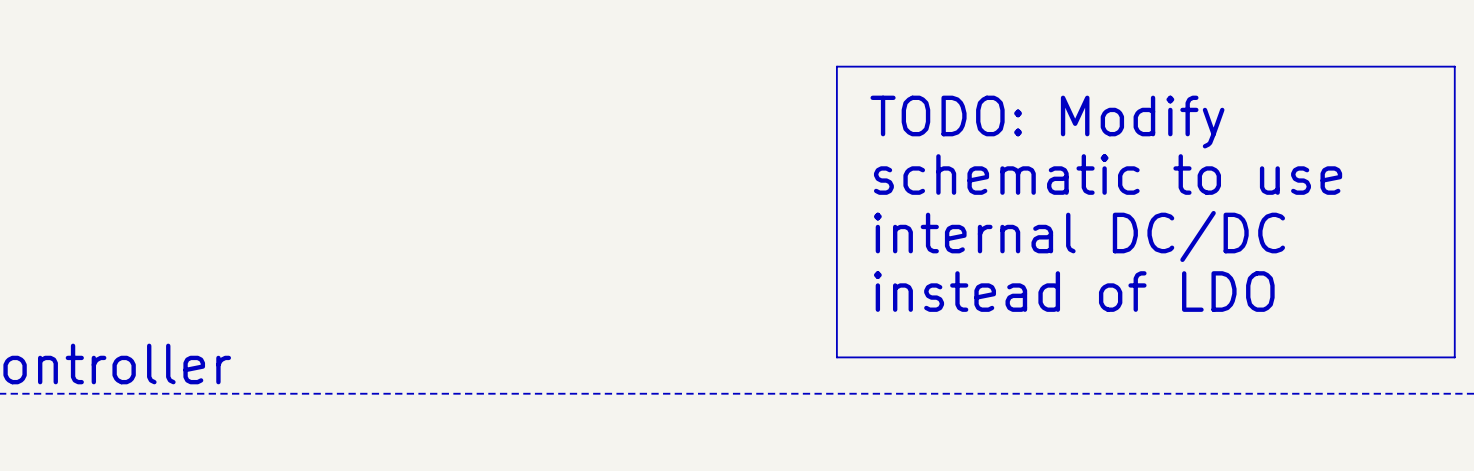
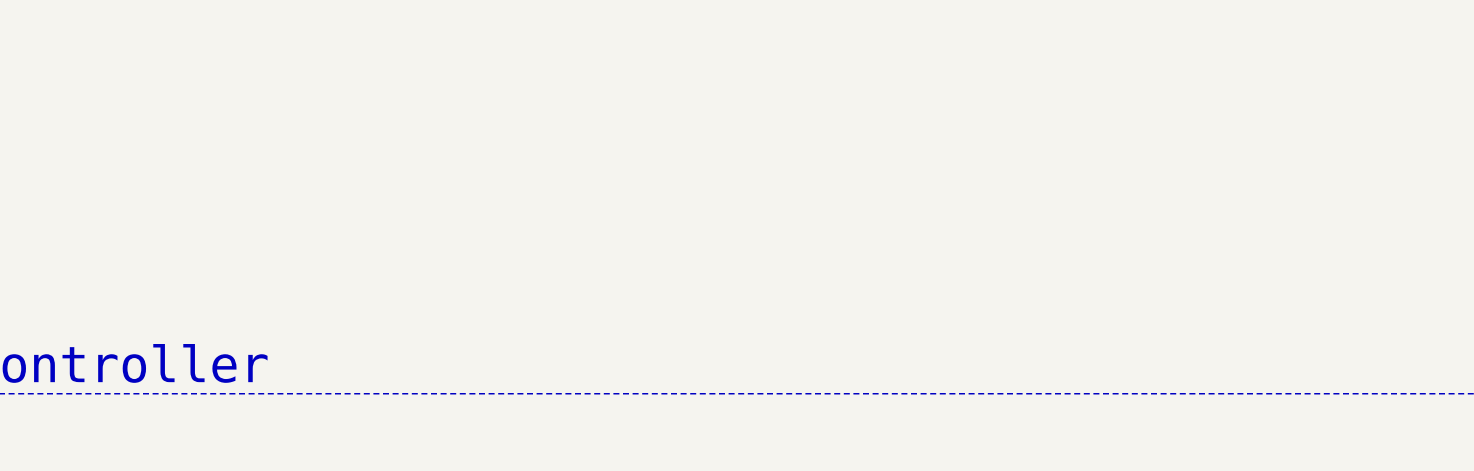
line: (836, 66) (1454, 66) (1454, 357) (836, 357) (836, 66) -> none
text: TODO: Modify (1047, 122) -> none
text: schematic to use (1108, 174) -> none
text: internal DC/DC (1079, 236) -> none
text: instead of LDO (1074, 291) -> none

